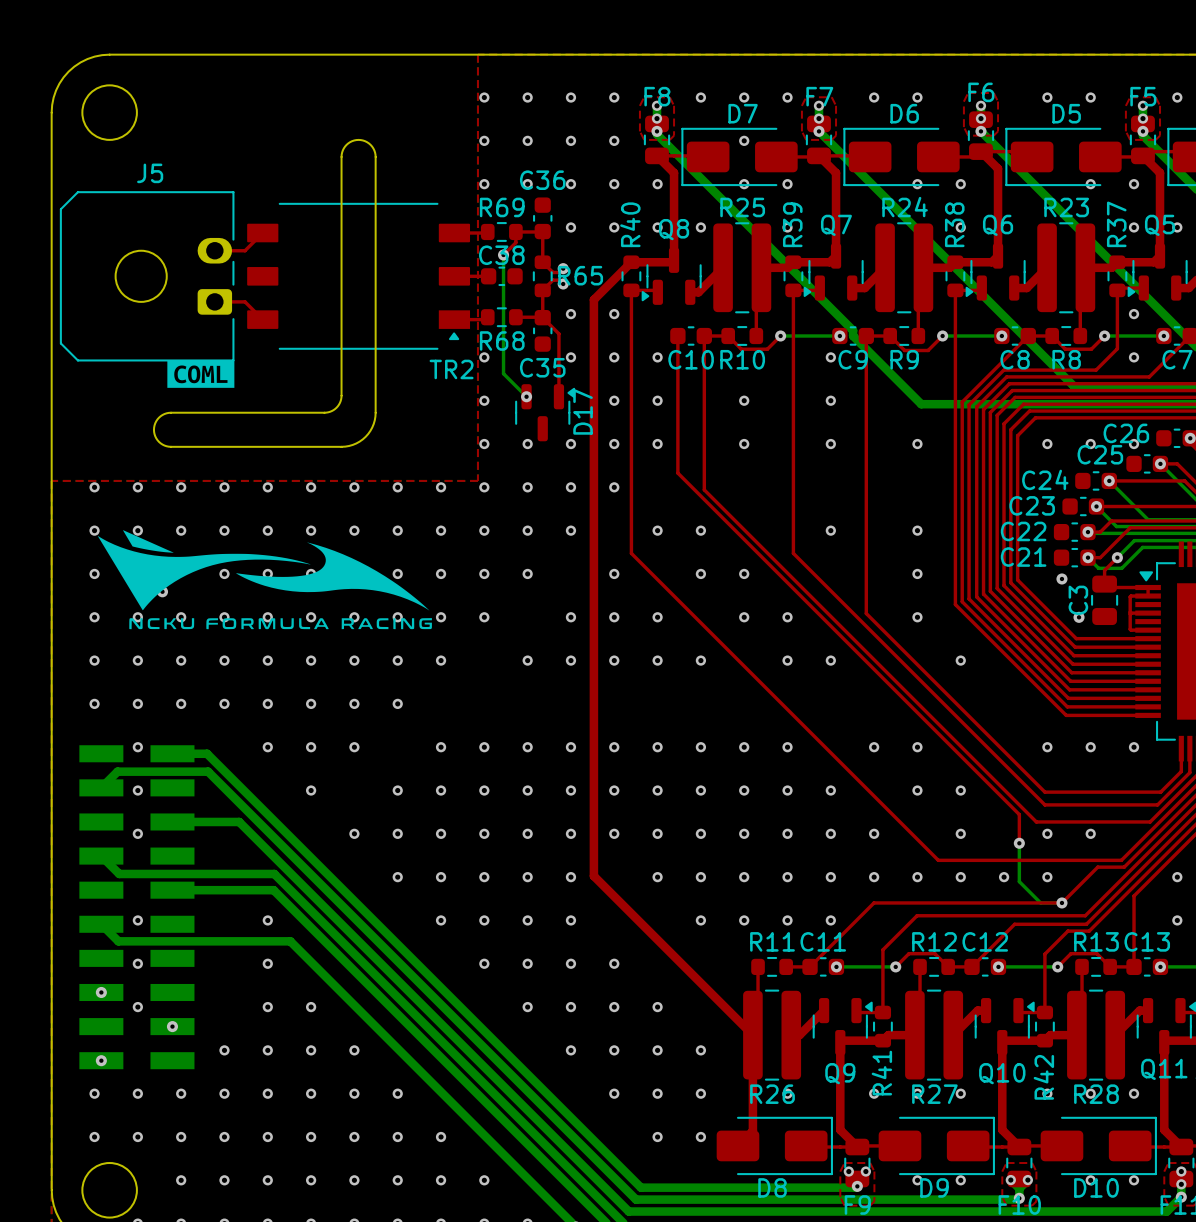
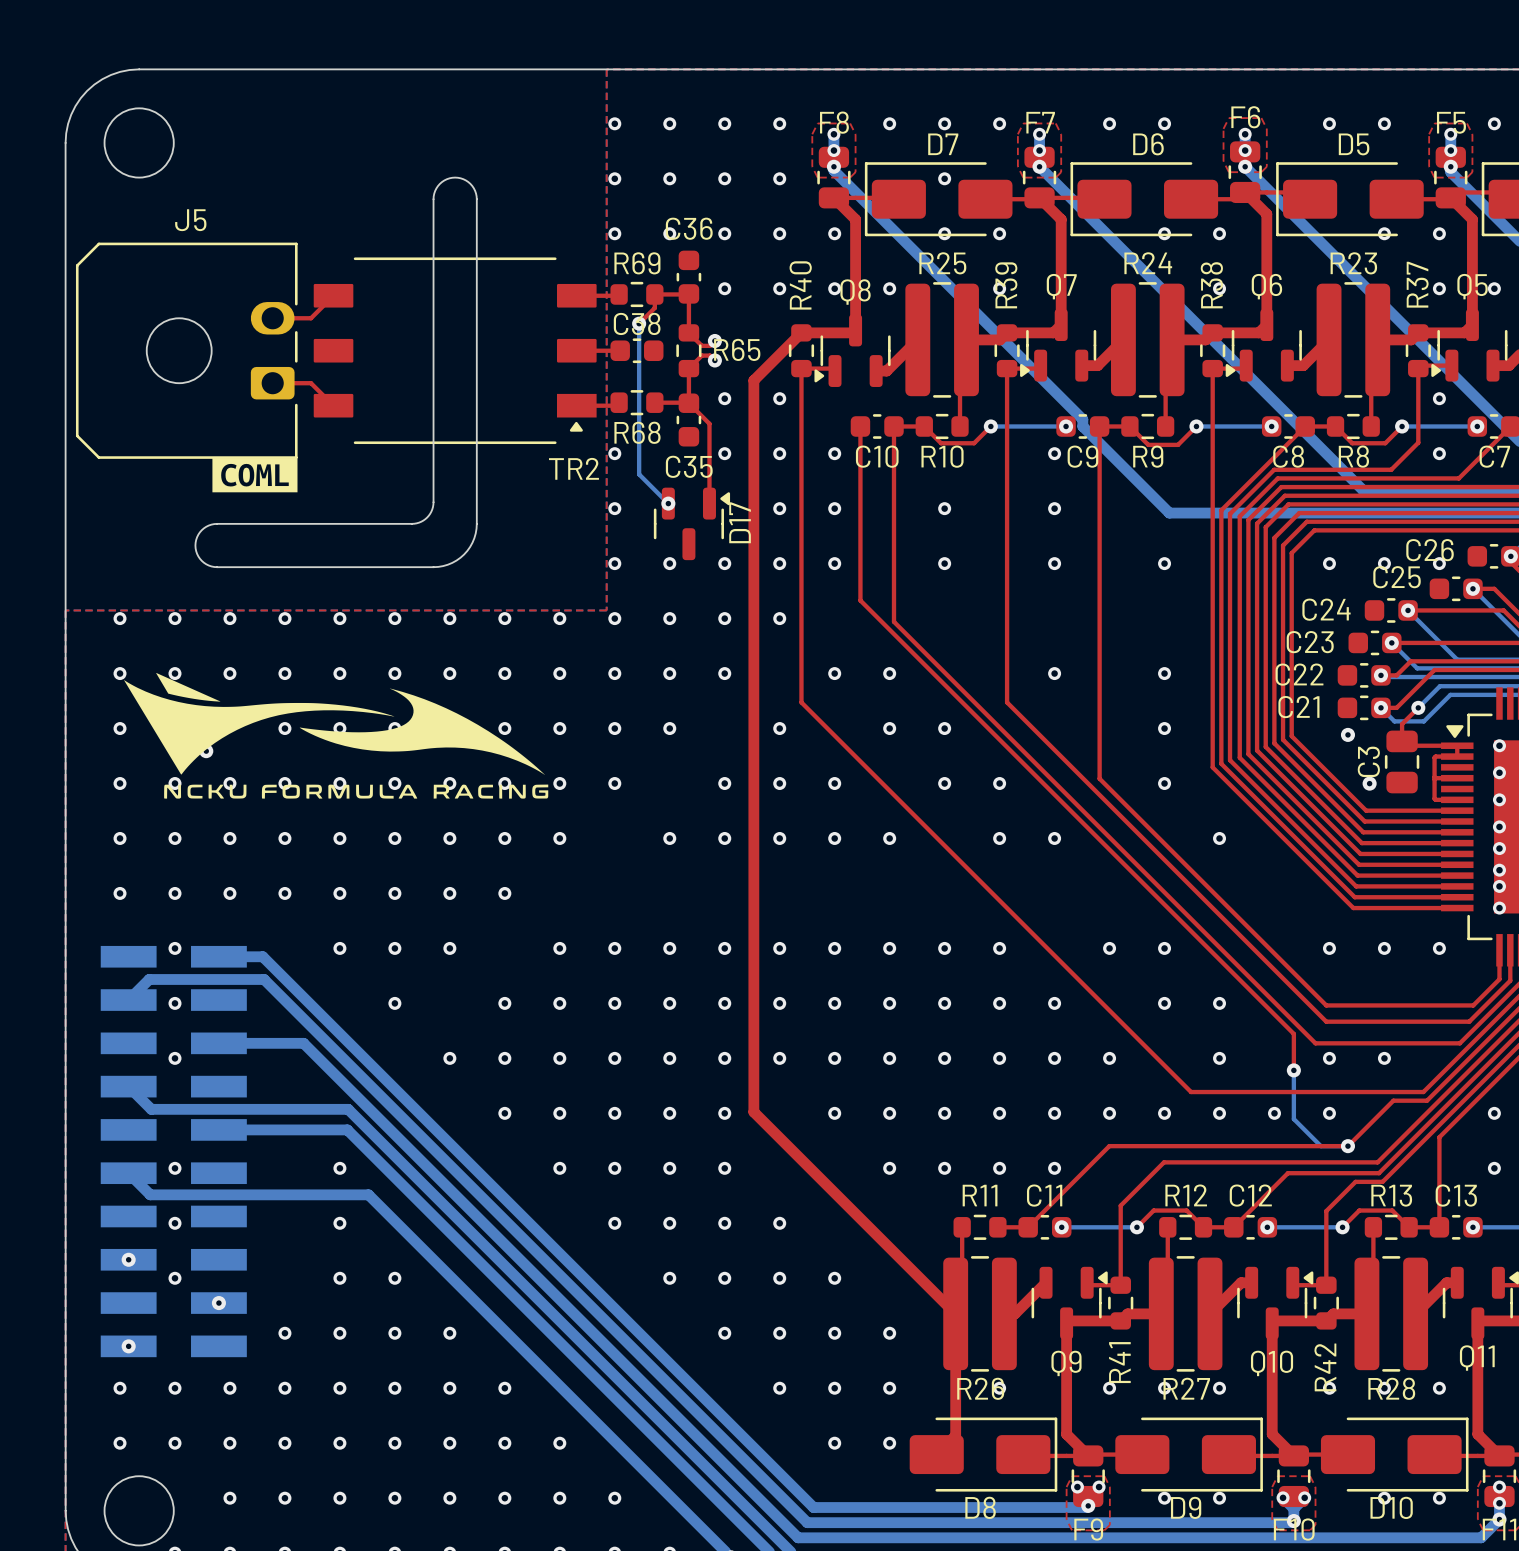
via: none -> (1499, 745)
via: none -> (1499, 772)
via: none -> (1499, 799)
via: none -> (1499, 826)
via: none -> (1499, 848)
via: none -> (1499, 870)
via: none -> (1499, 886)
via: none -> (1499, 908)

